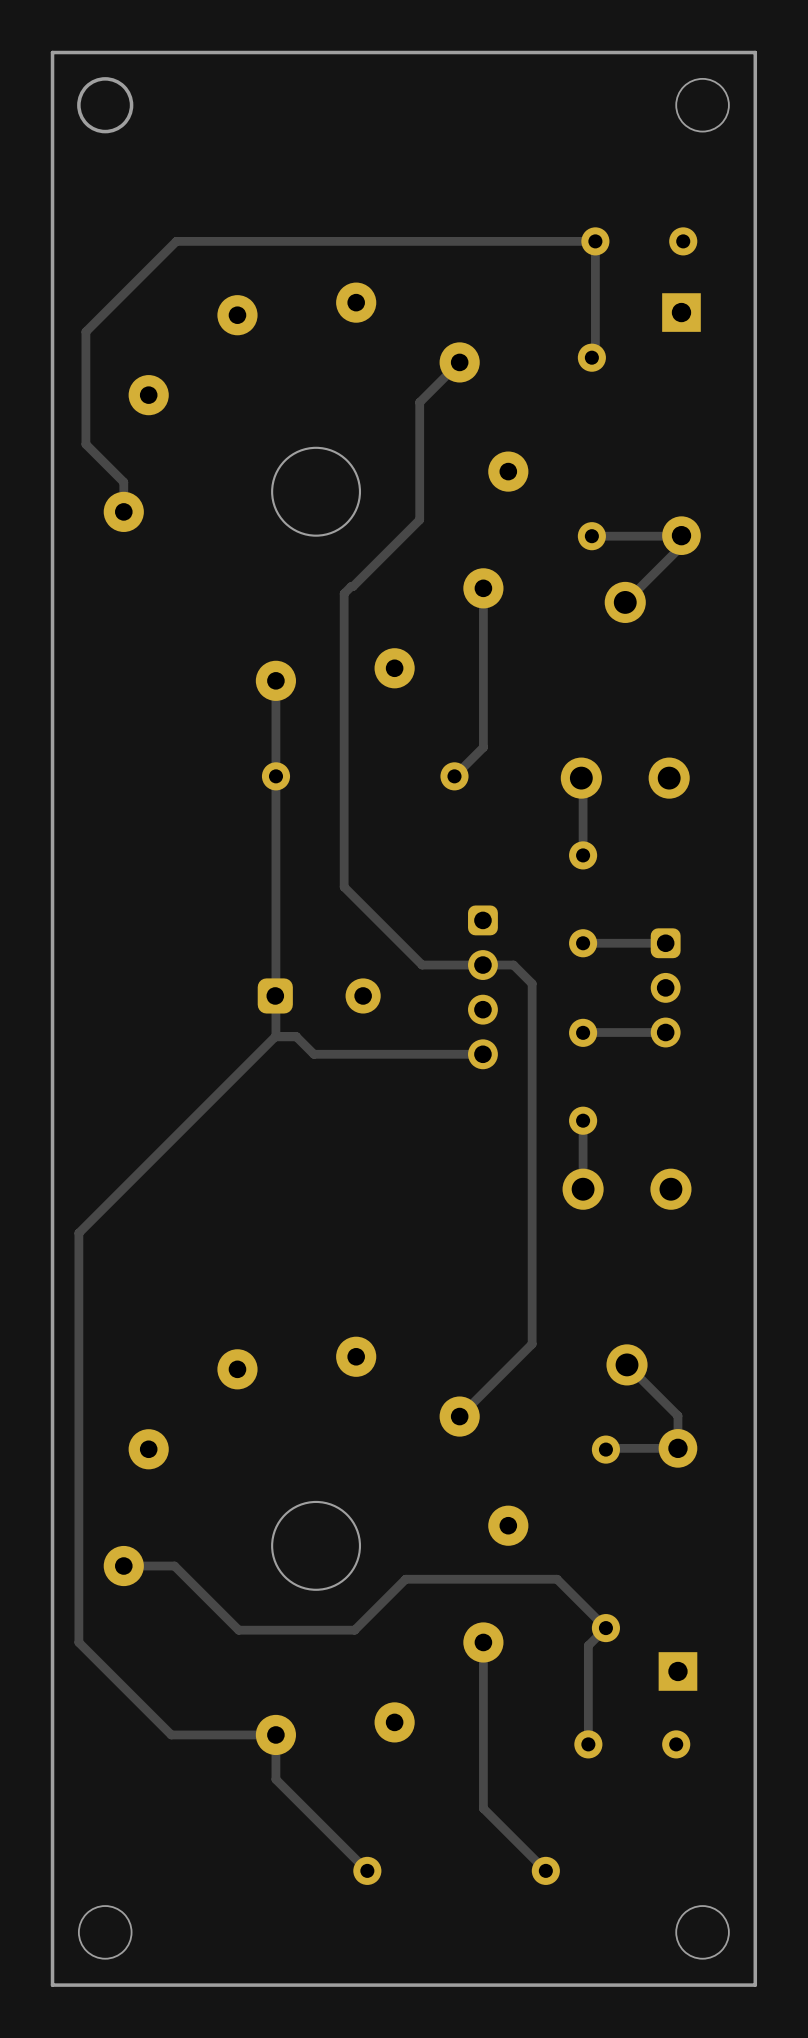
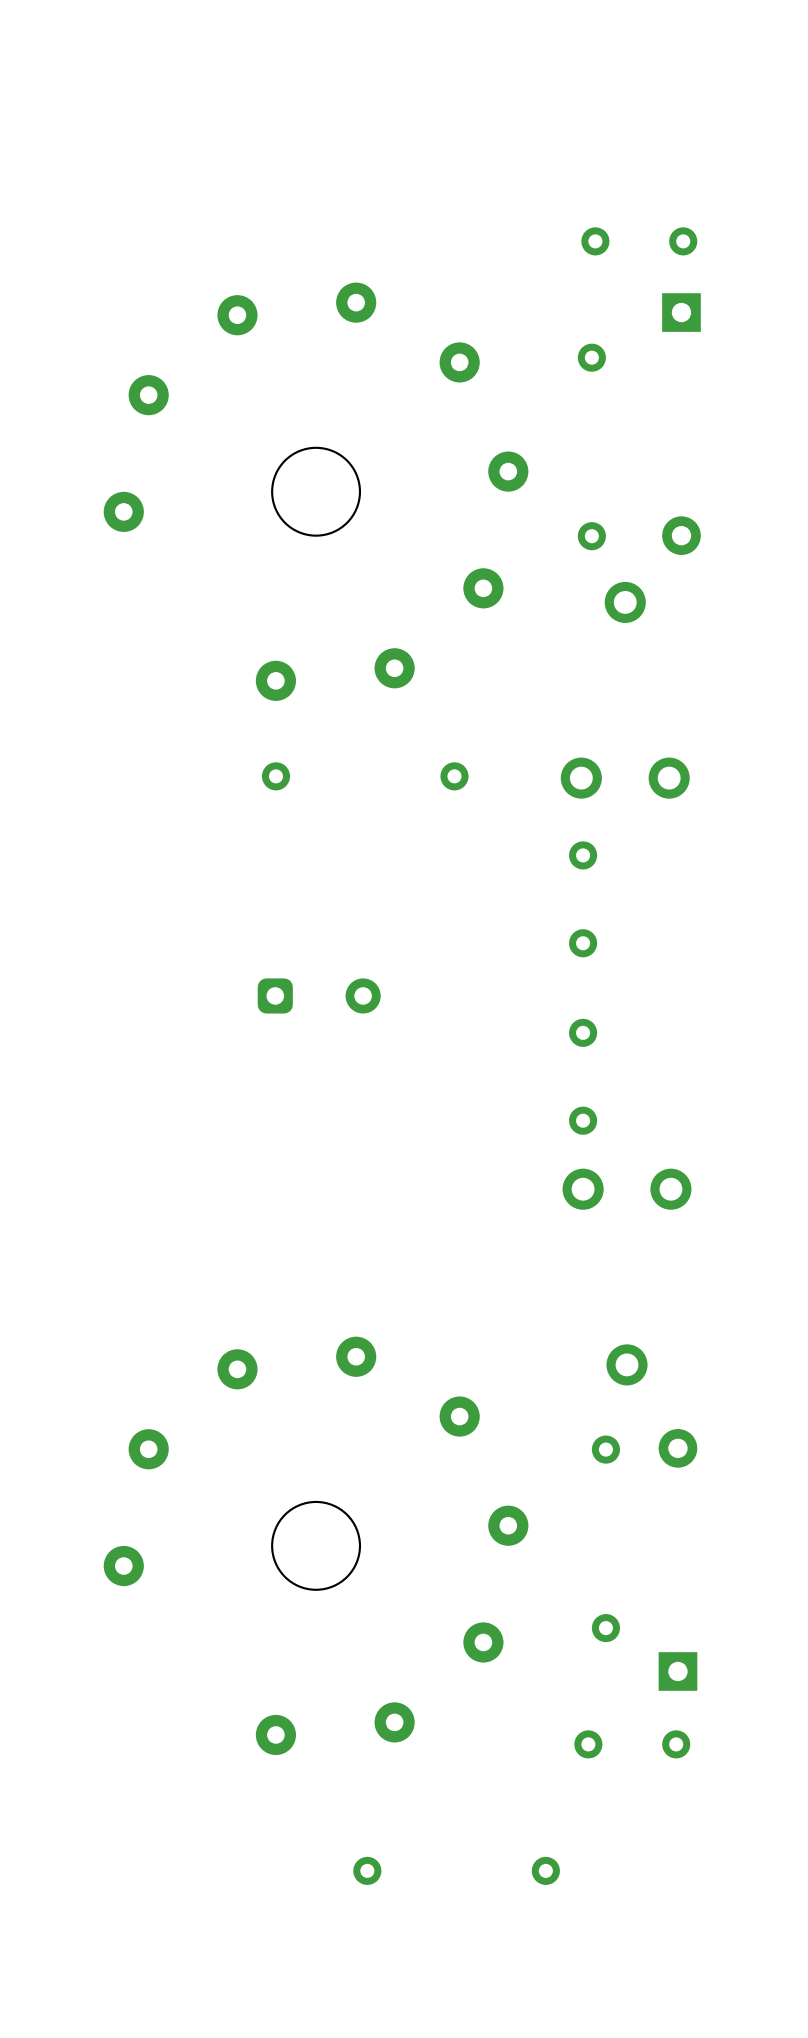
board edge: (755, 52) (755, 1985) (52, 1985) (52, 52) (755, 52) -> none
round board edge: [77, 77, 134, 134] -> none
round board edge: [675, 77, 730, 133] -> none
track: (591, 357) (595, 354) (595, 241) (176, 241) (85, 331) (85, 444) (123, 482) (123, 511) -> none
track: (459, 362) (419, 402) (419, 519) (344, 593) (344, 887) (422, 965) (513, 965) (532, 983) (532, 1344) (459, 1416) -> none
track: (591, 536) (681, 535) (681, 546) (625, 602) -> none
track: (484, 586) (483, 747) (454, 776) -> none
track: (275, 680) (275, 1036) -> none
track: (581, 778) (583, 779) (583, 855) -> none
track: (665, 943) (583, 943) -> none
part: (482, 987) -> none
part: (665, 987) -> none
track: (665, 1032) (583, 1032) -> none
track: (482, 1054) (313, 1054) (296, 1036) (275, 1036) (78, 1233) (78, 1642) (171, 1734) (275, 1734) (275, 1779) (367, 1870) -> none
track: (583, 1120) (583, 1189) -> none
track: (627, 1364) (677, 1415) (677, 1448) (605, 1449) -> none
track: (123, 1566) (174, 1566) (238, 1630) (354, 1630) (405, 1579) (557, 1579) (605, 1628) (588, 1645) (588, 1744) -> none
track: (483, 1642) (483, 1808) (545, 1870) -> none
round board edge: [77, 1905, 133, 1960] -> none
round board edge: [675, 1905, 730, 1960] -> none

